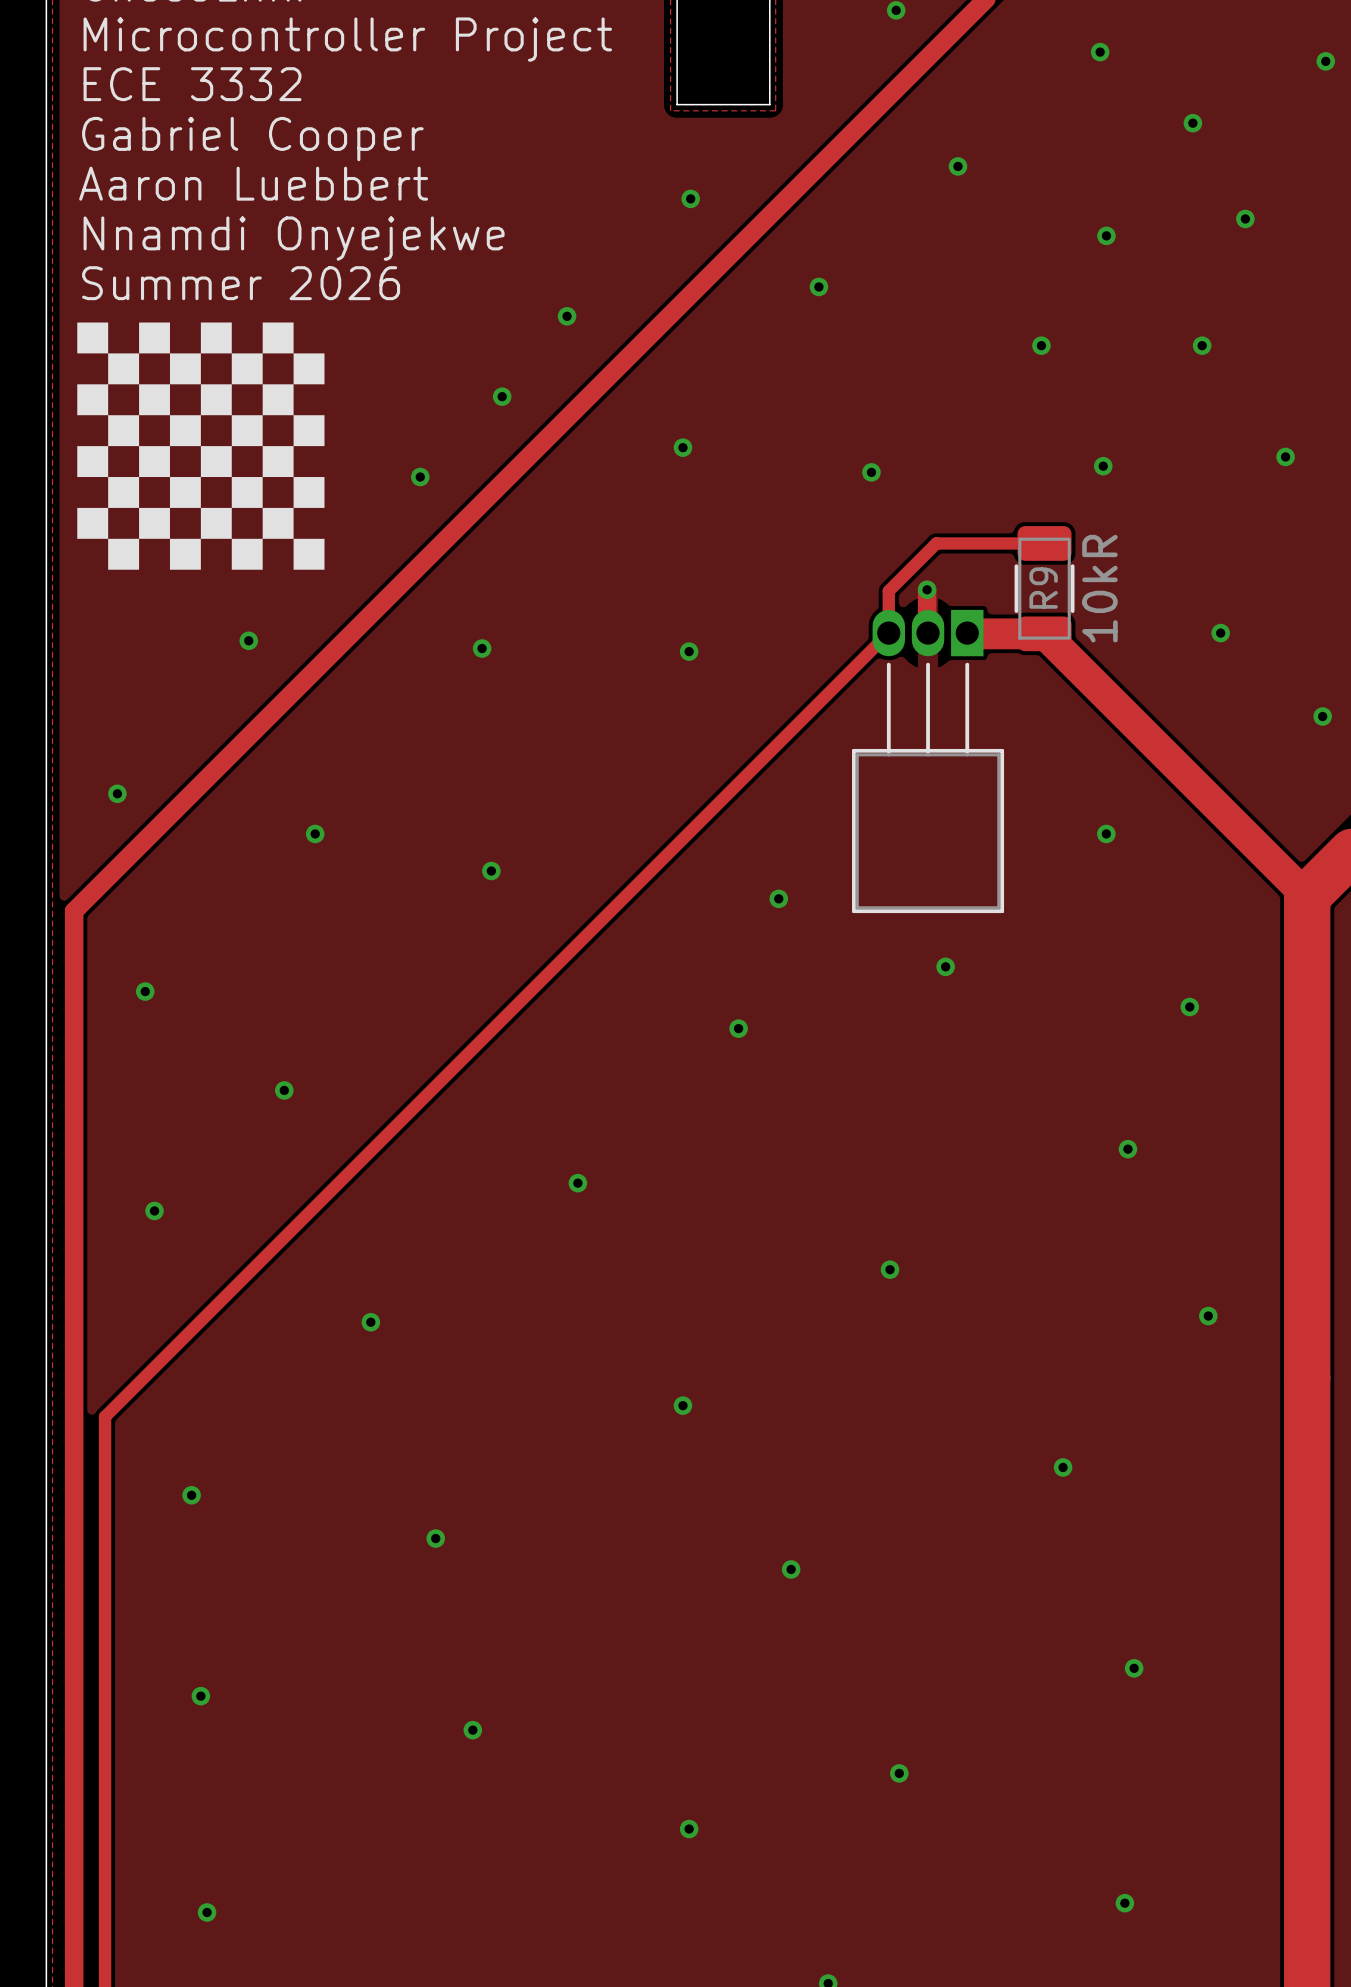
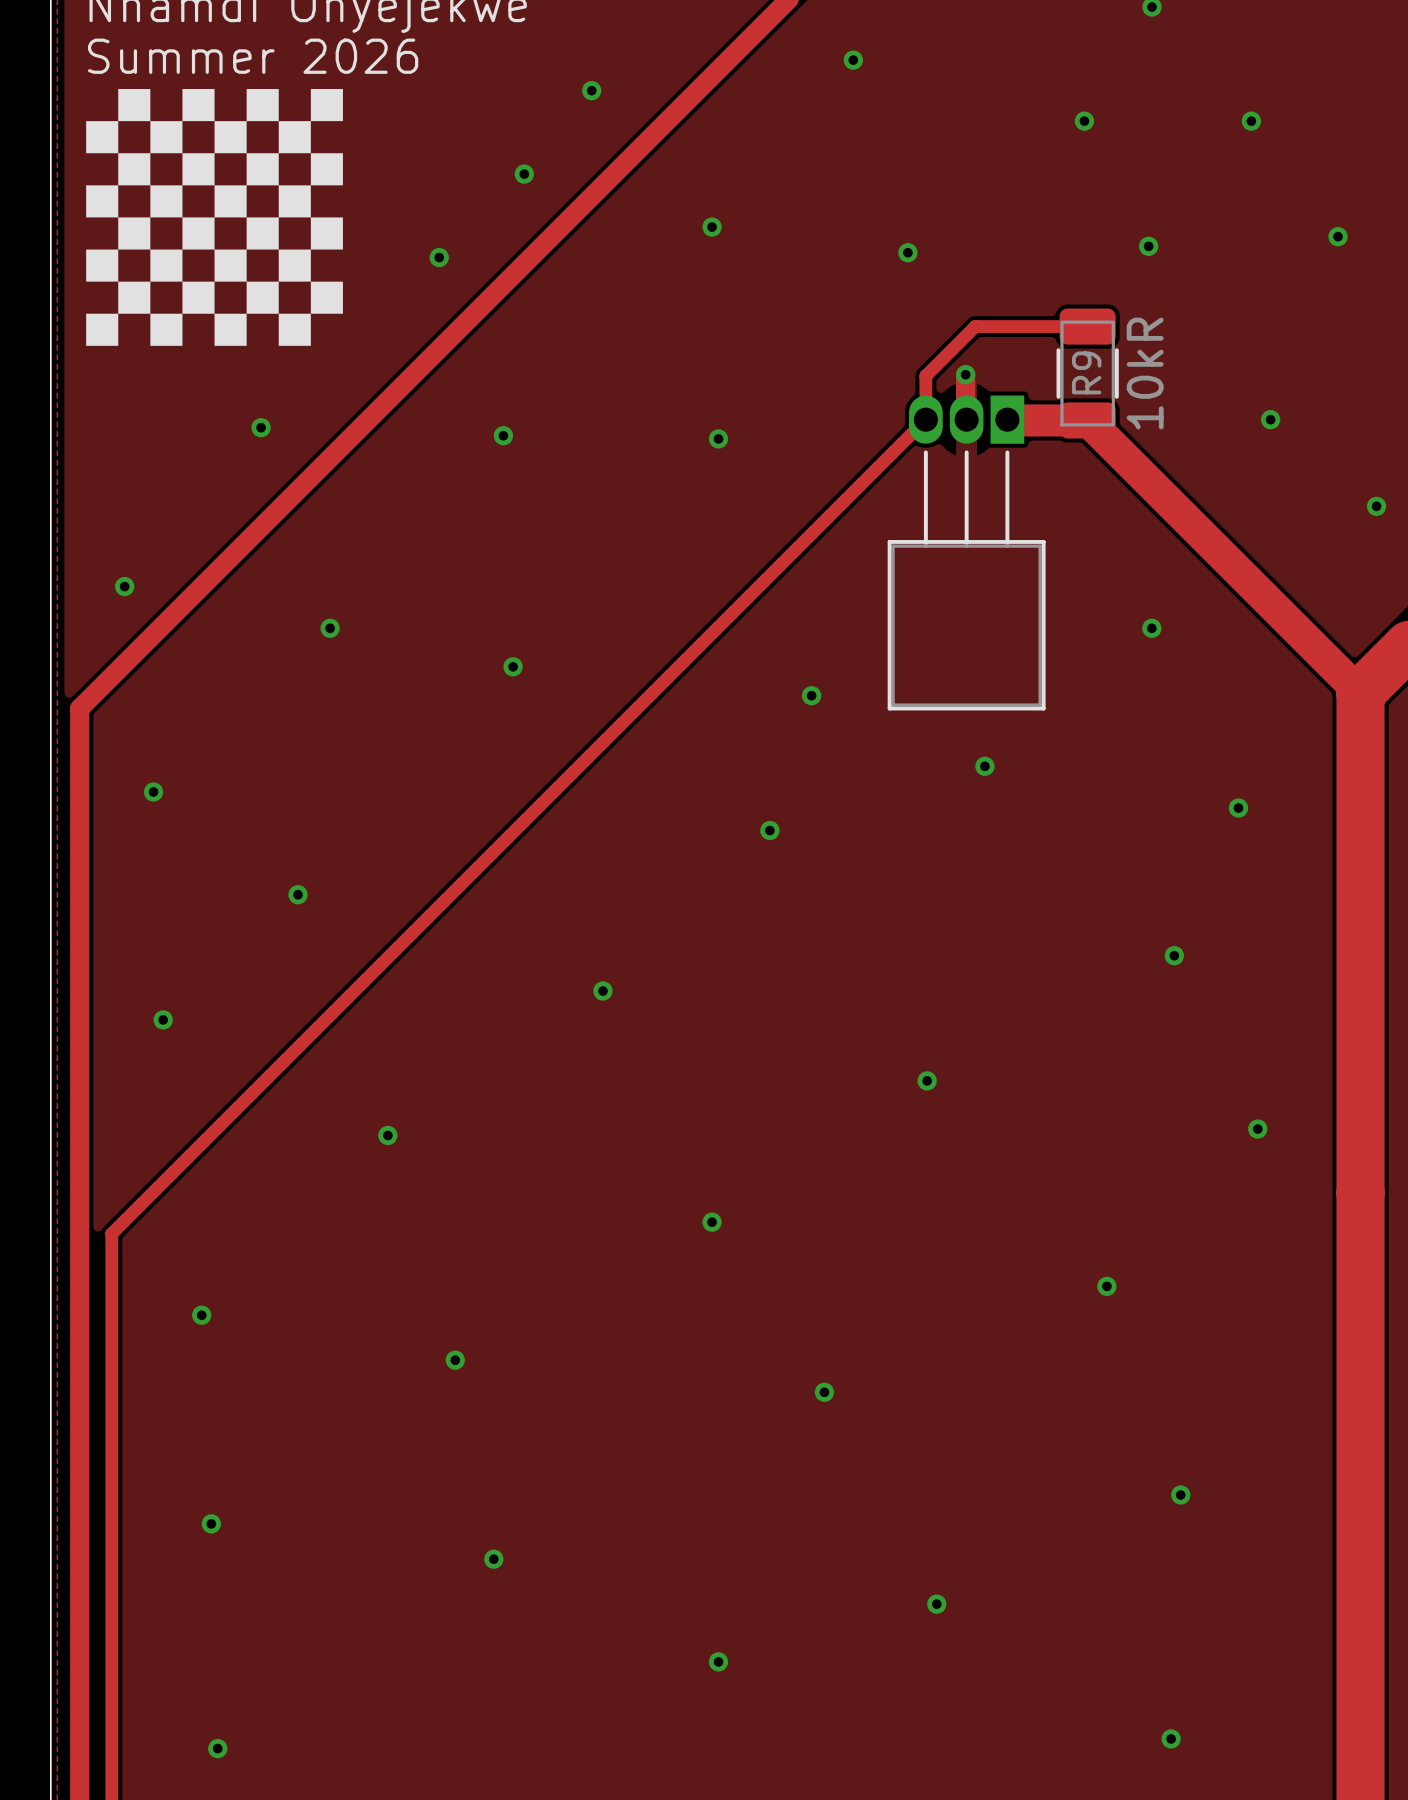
drawing: none -> [86, 89, 343, 346]
drawing: [77, 322, 325, 570] -> none

